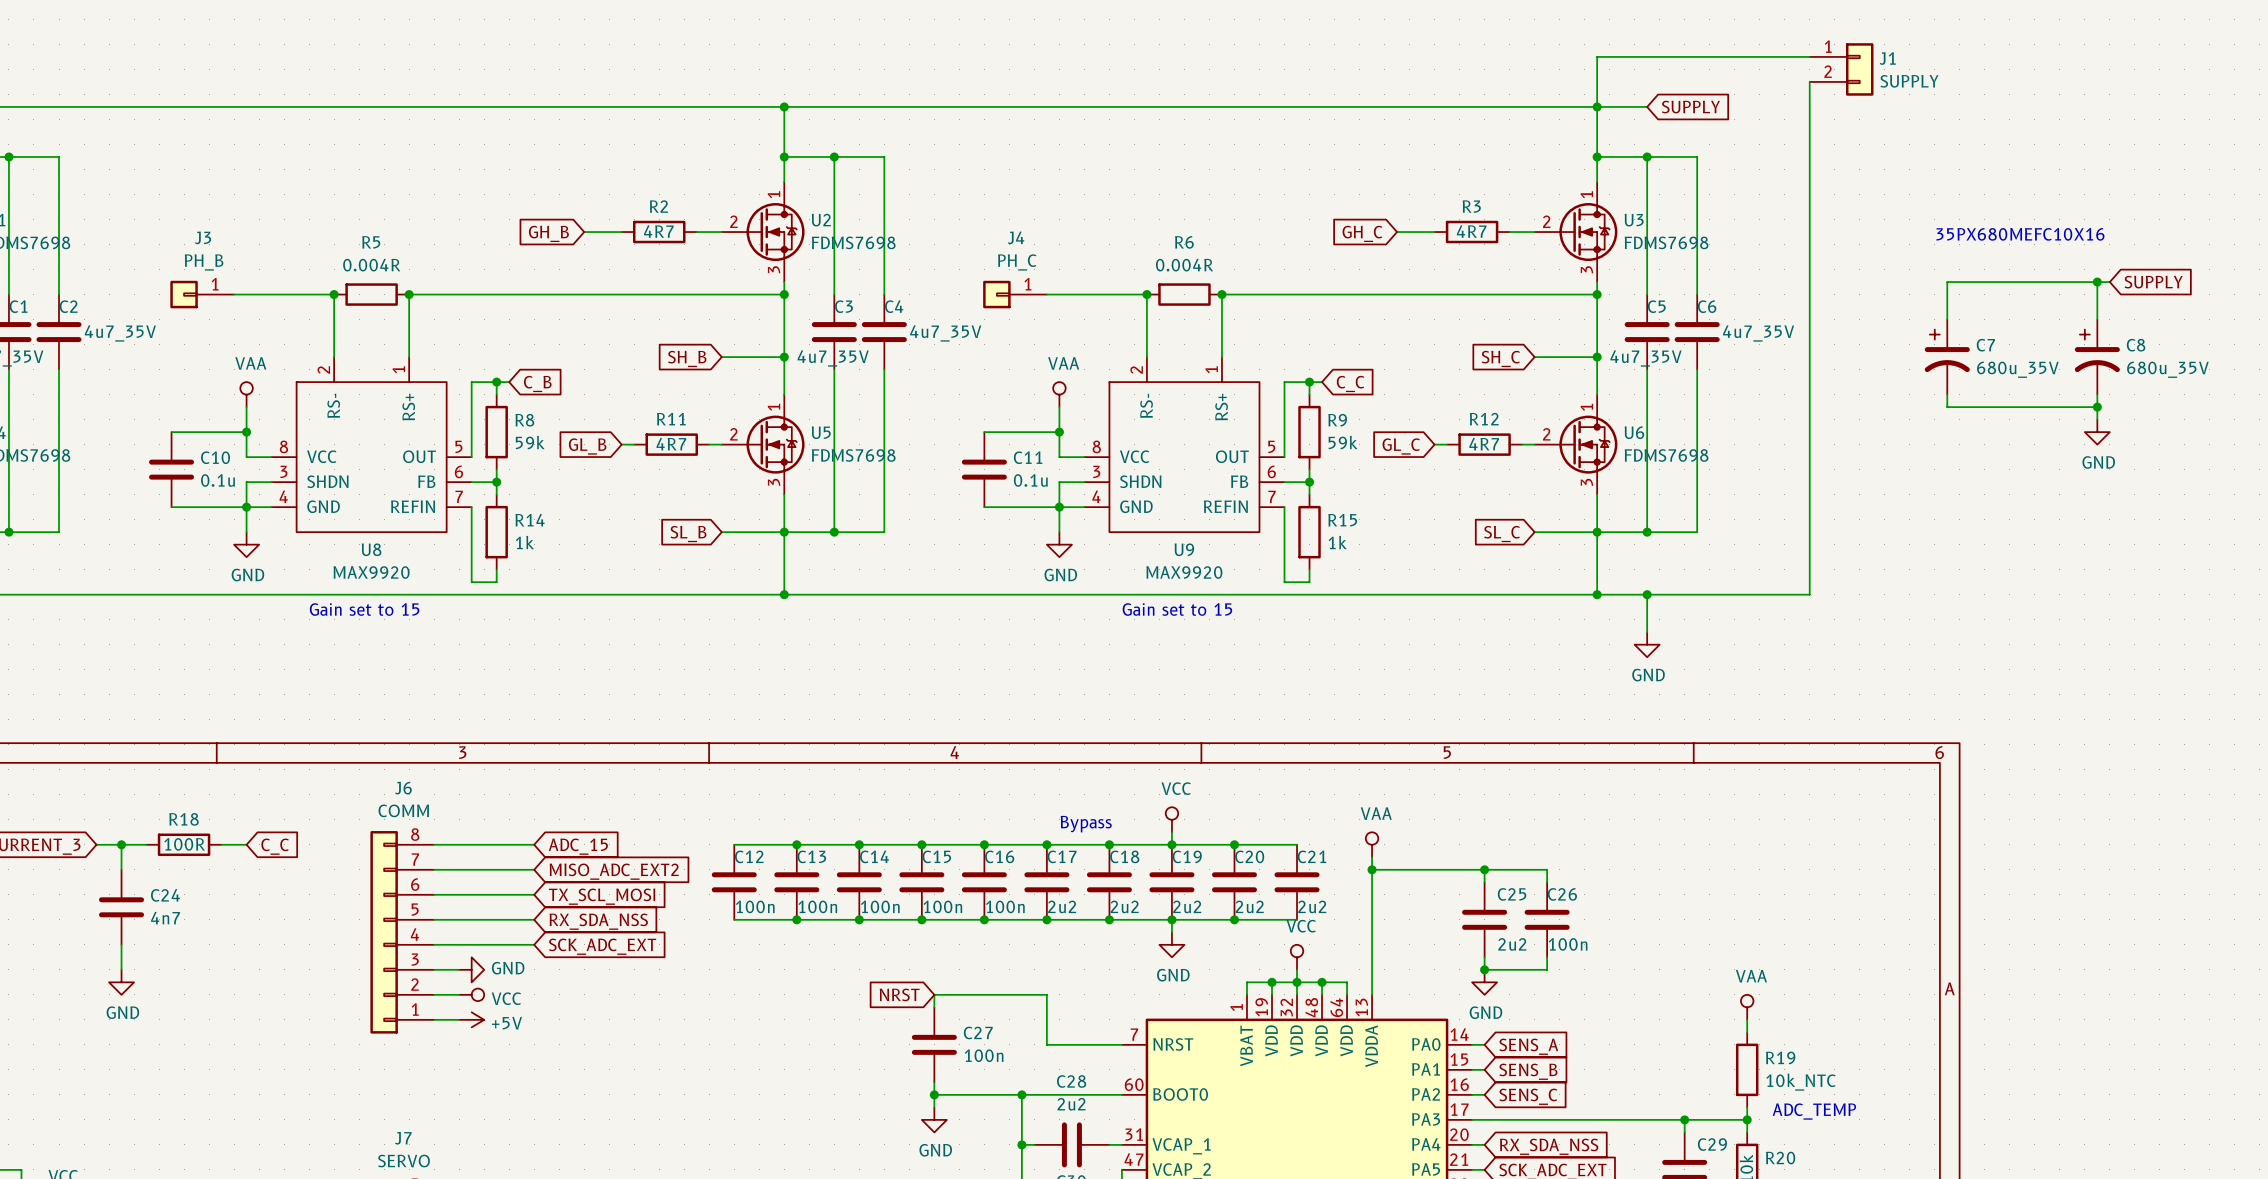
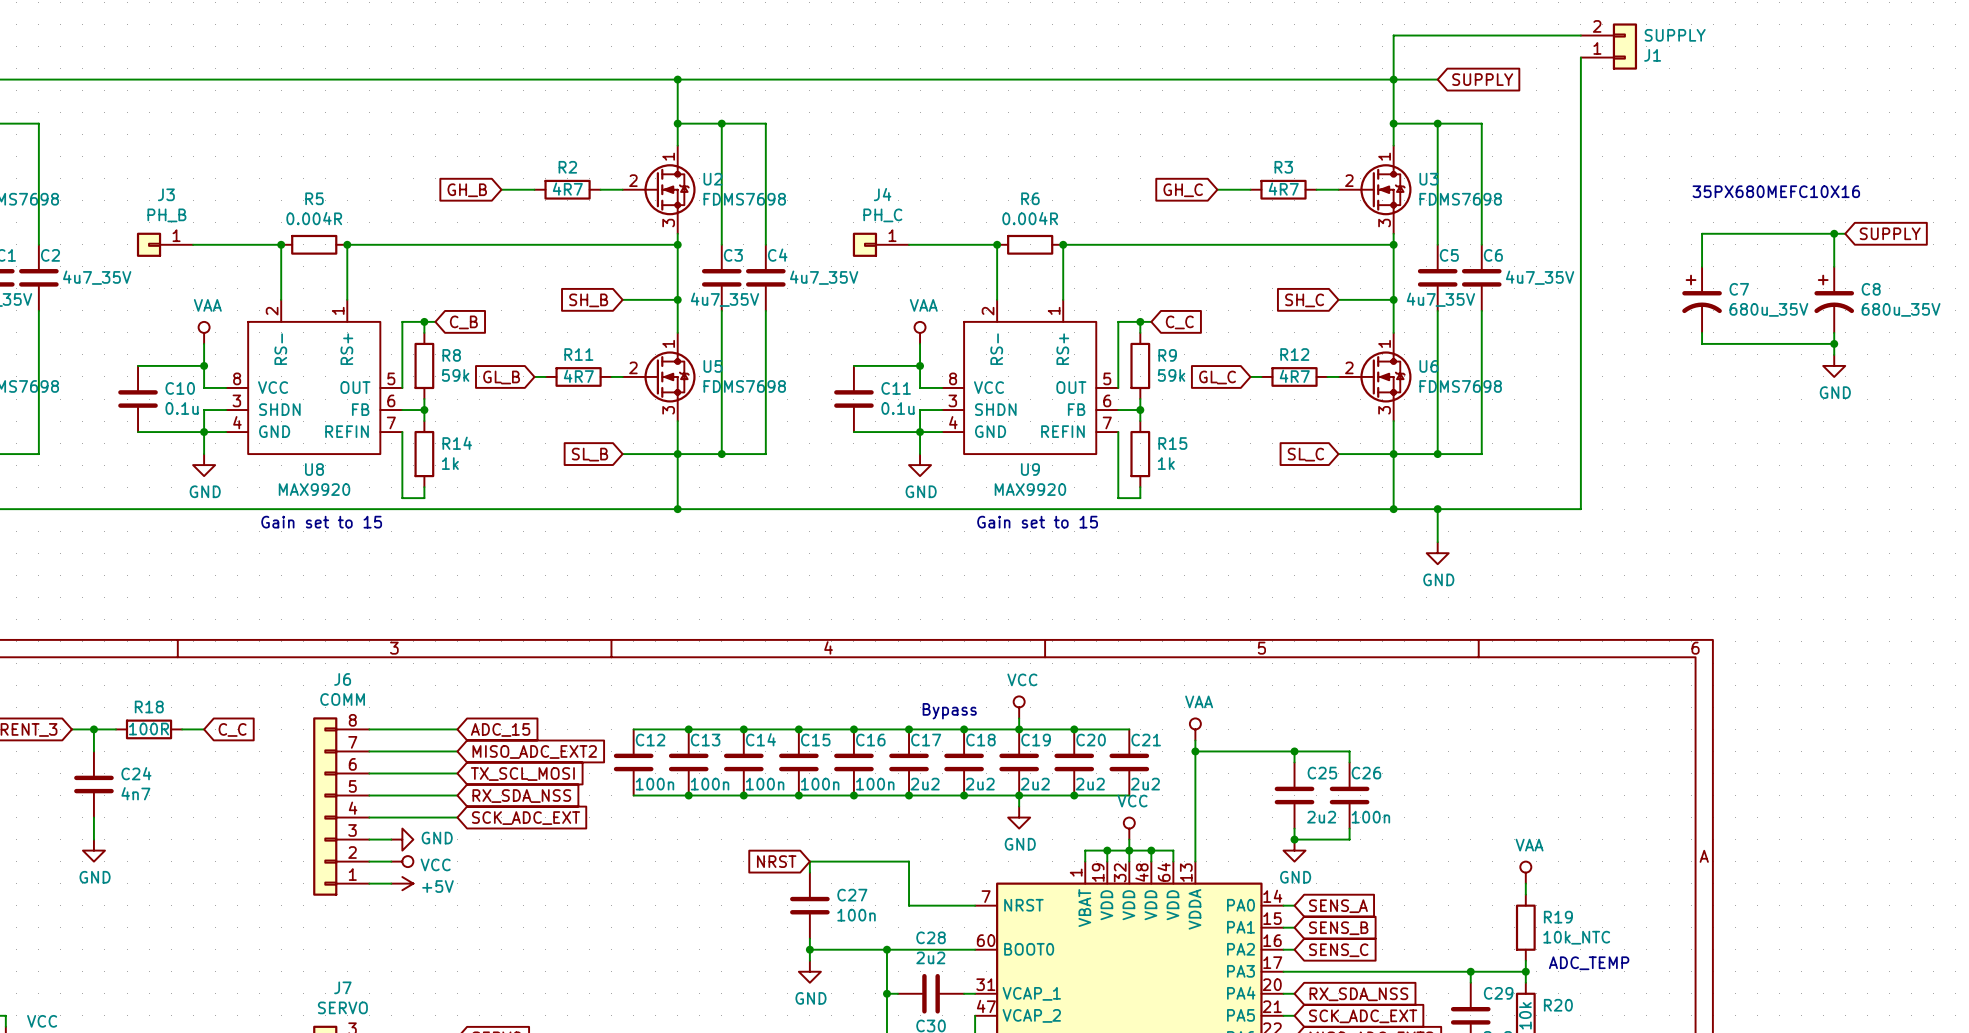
J1 flip: as is (1859, 69) -> up-down (1624, 46)

